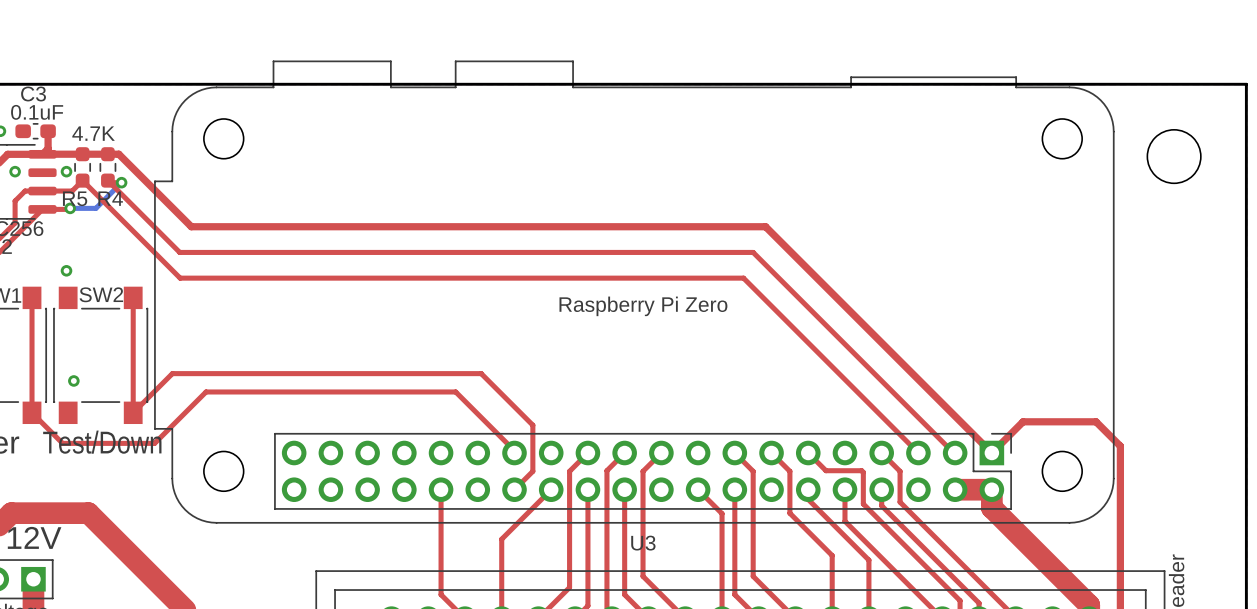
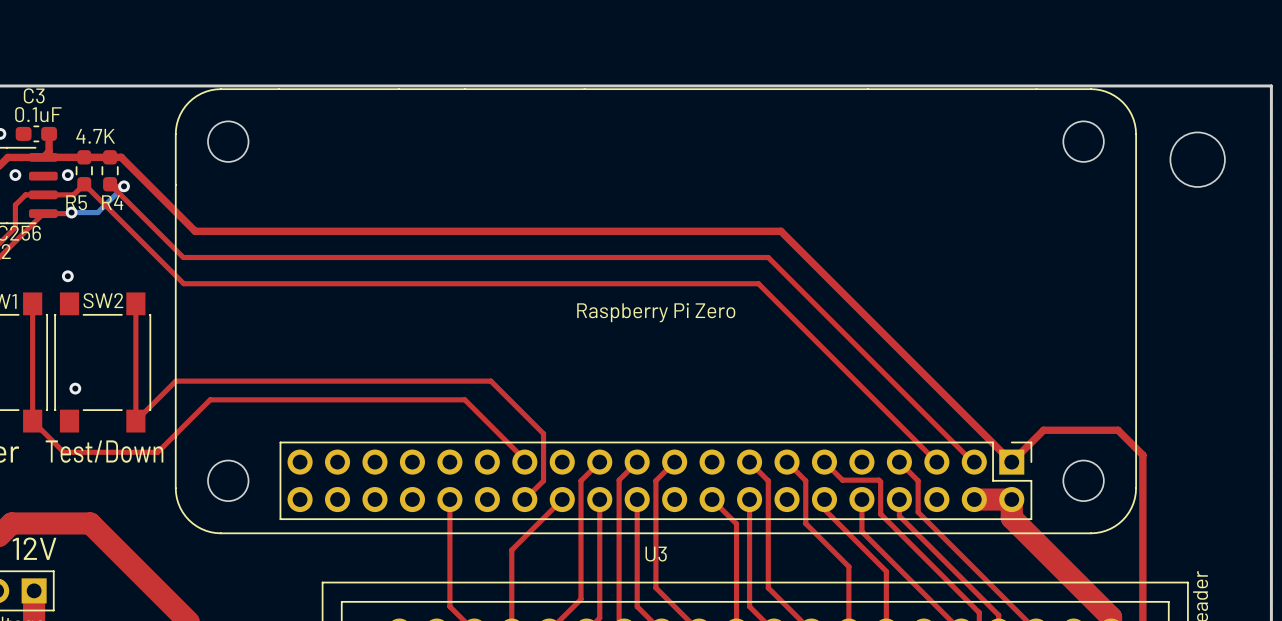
U3 footprint: [154, 60, 1115, 524] -> [174, 88, 1137, 535]

